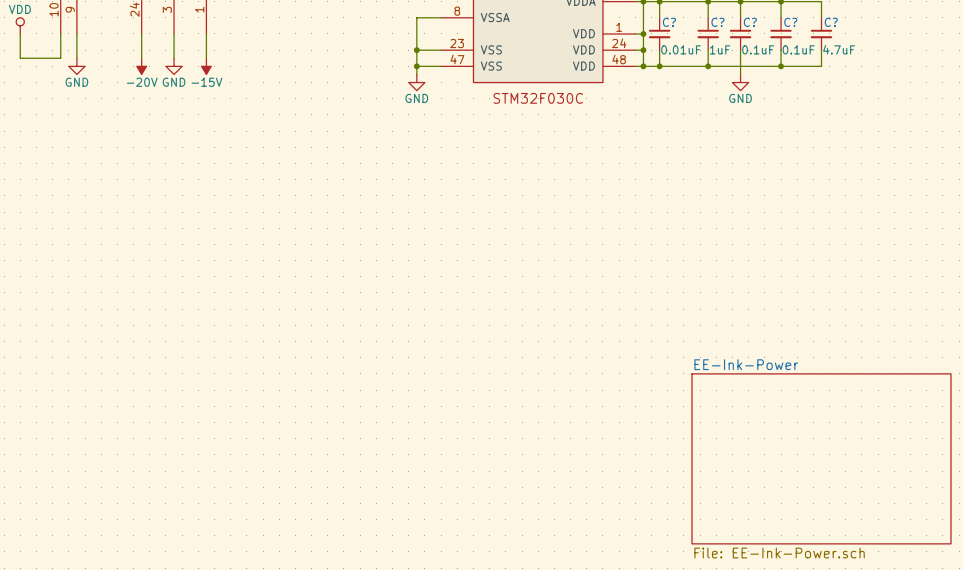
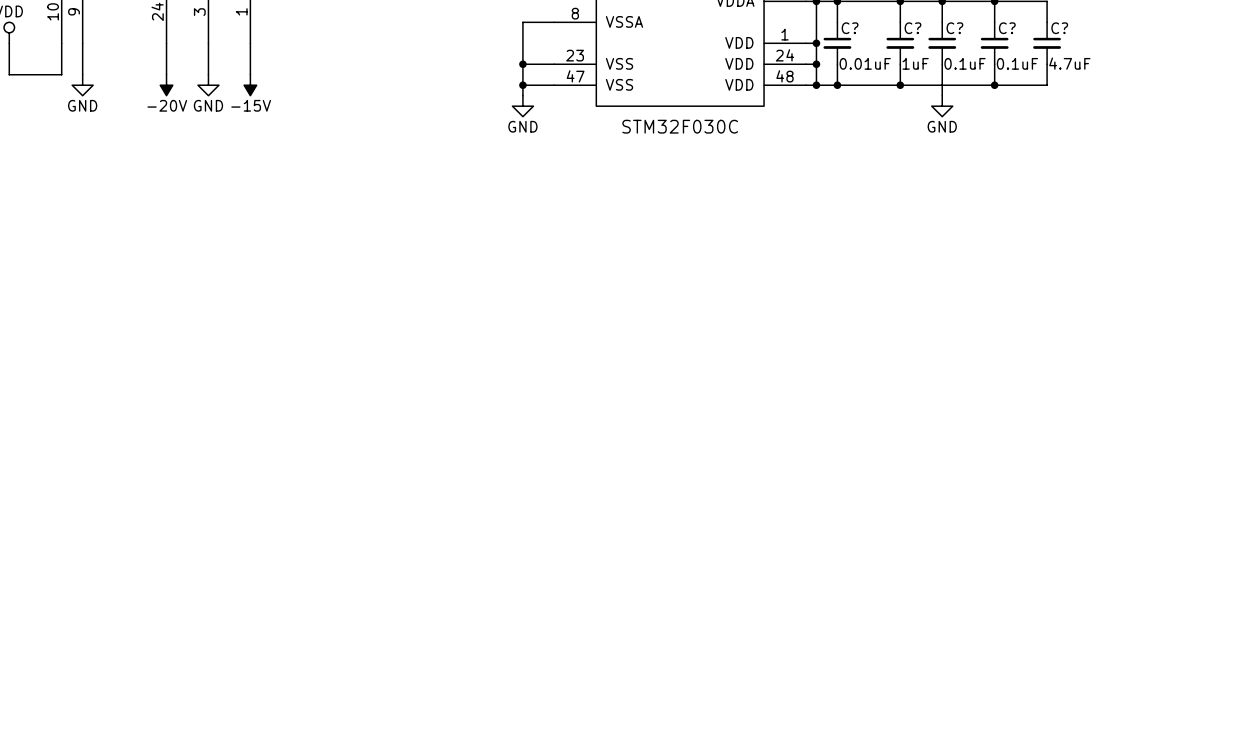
sheet EE-Ink-Power: File: EE-Ink-Power.sch (821, 458) -> none

